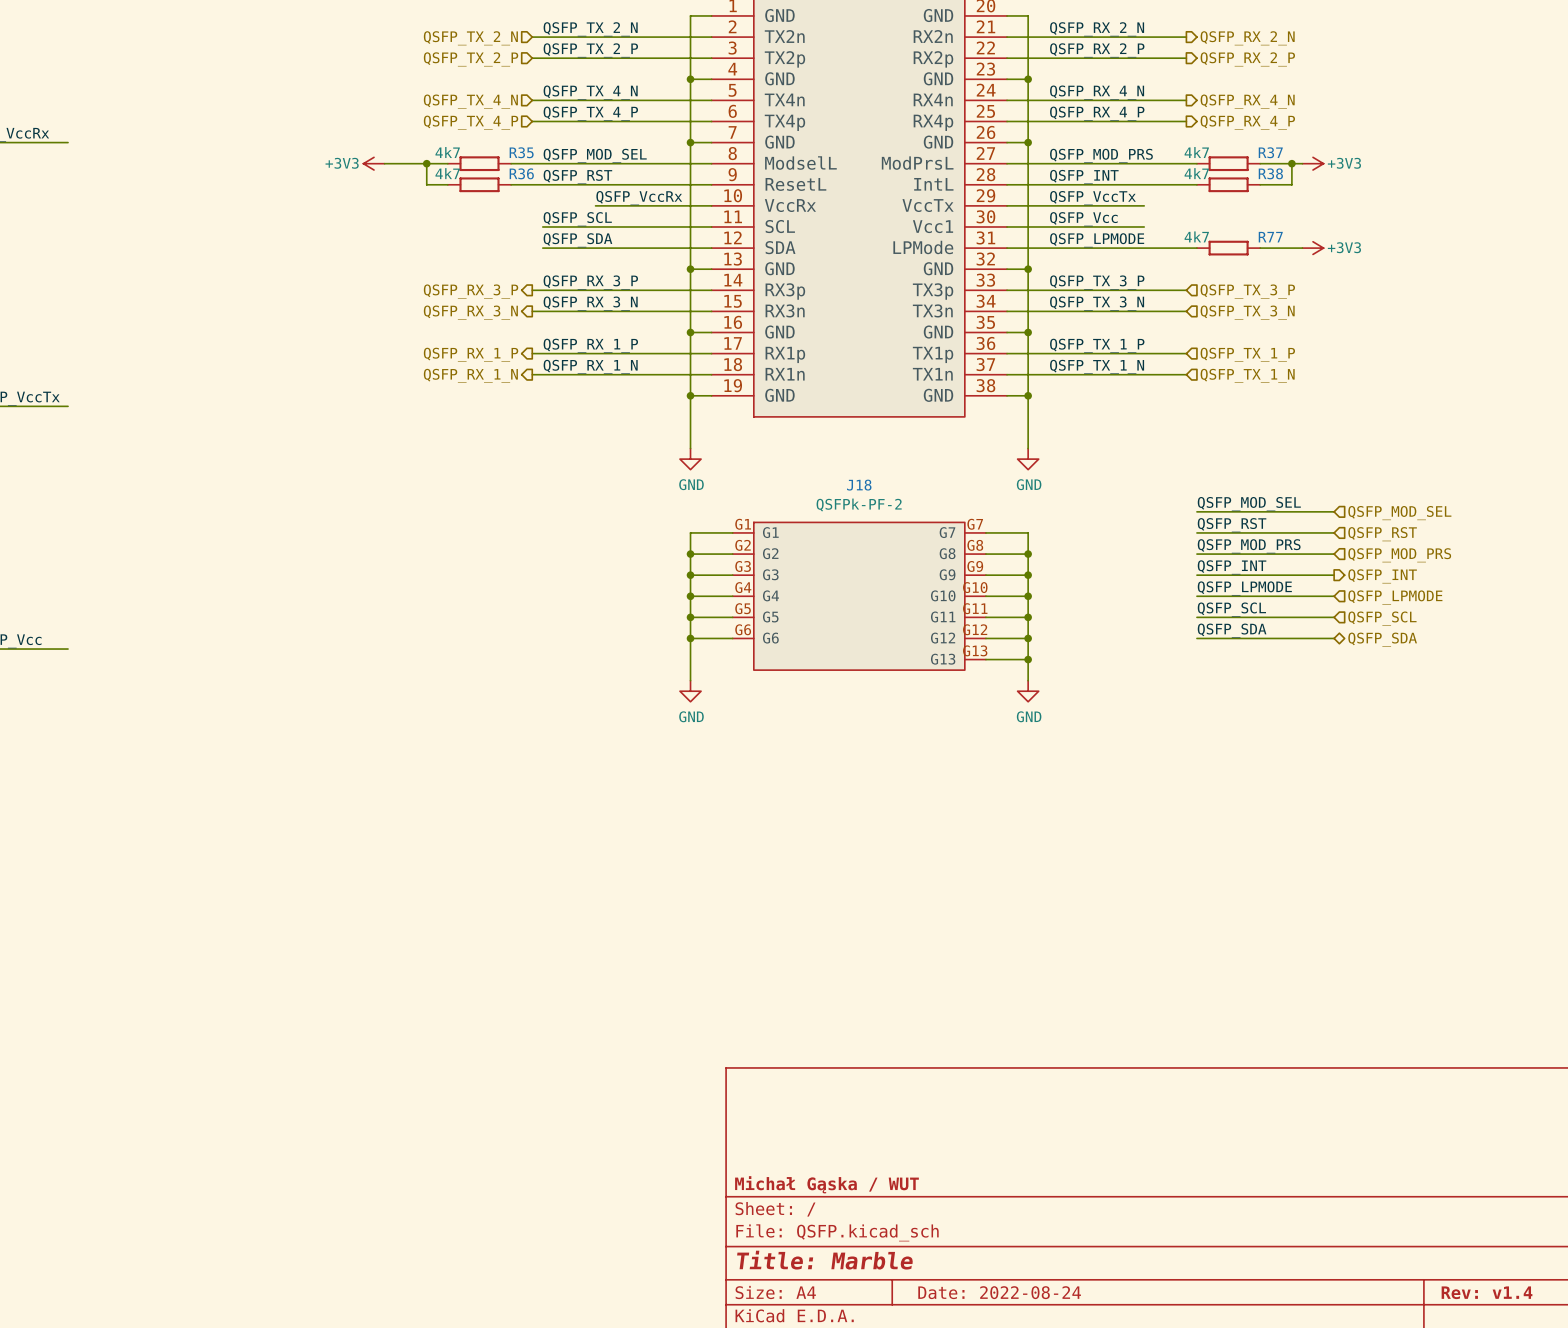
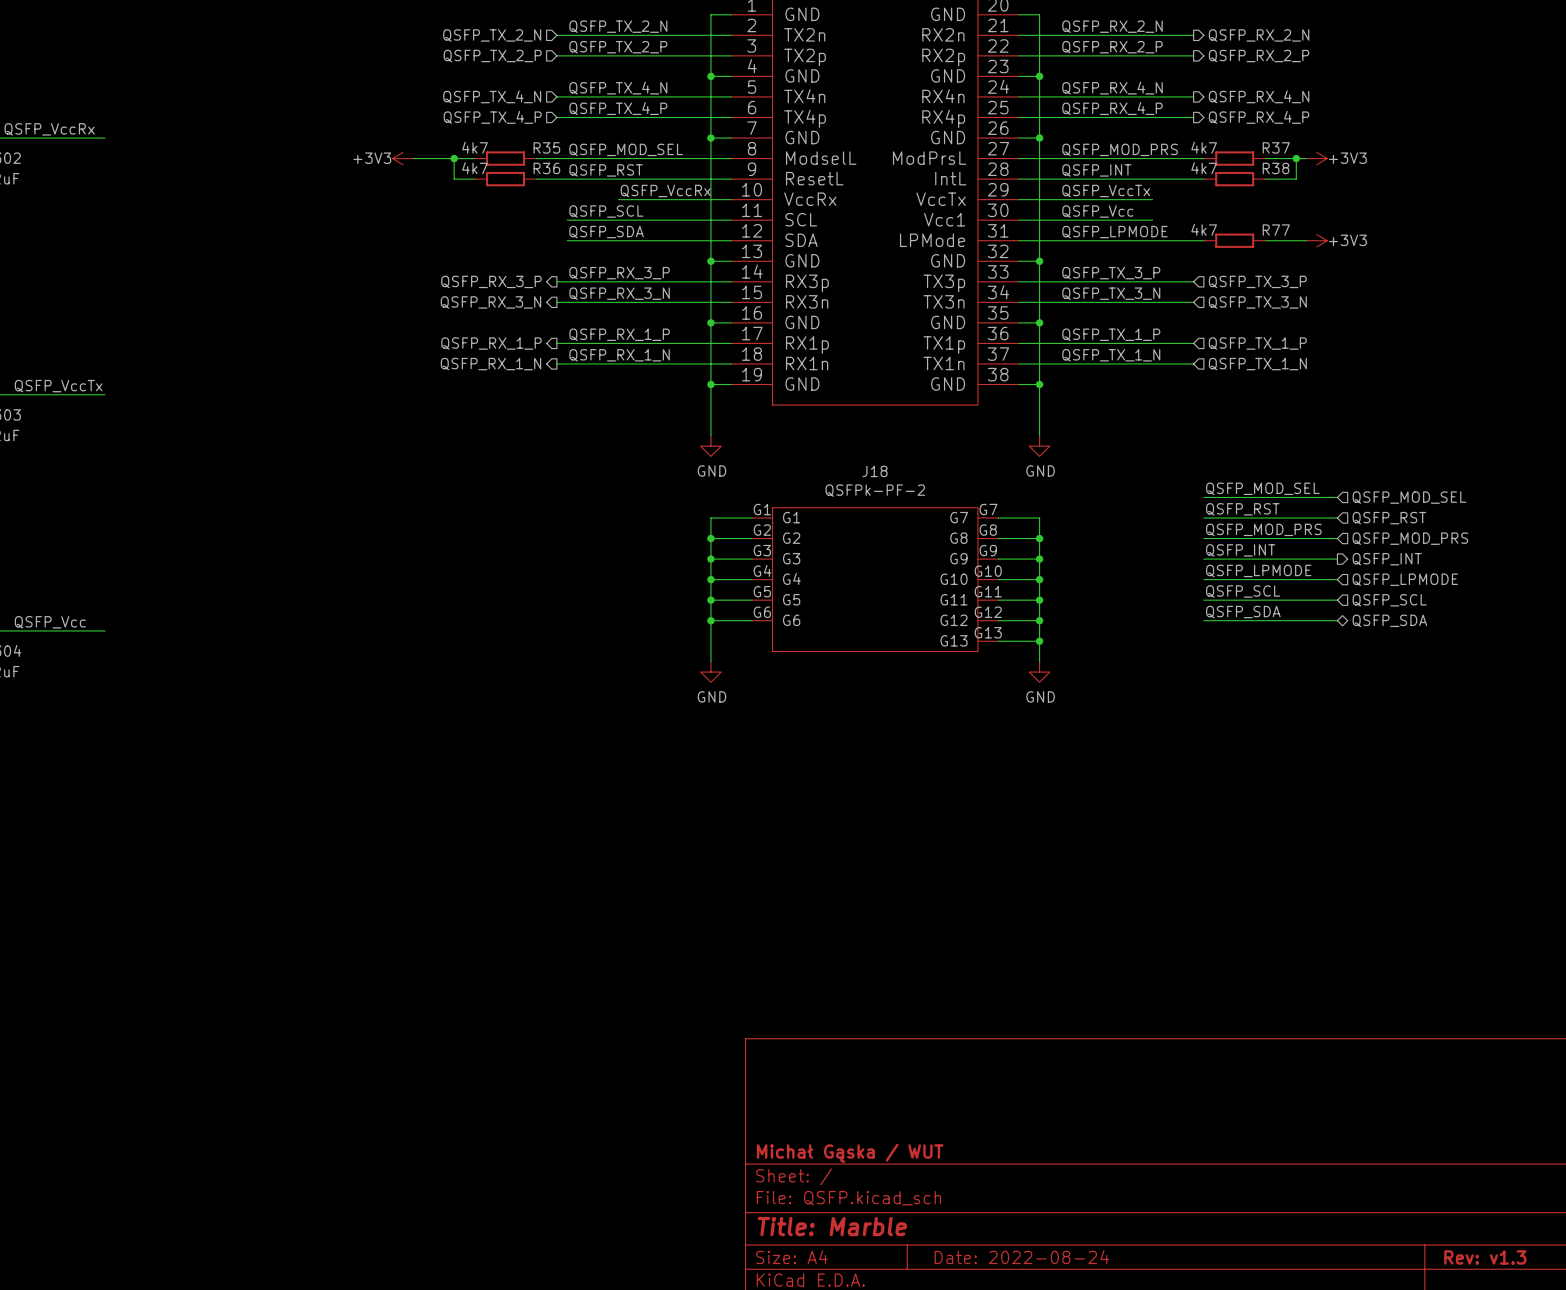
title block: Rev: v1.4 (1487, 1292) -> Rev: v1.3 (1485, 1257)

